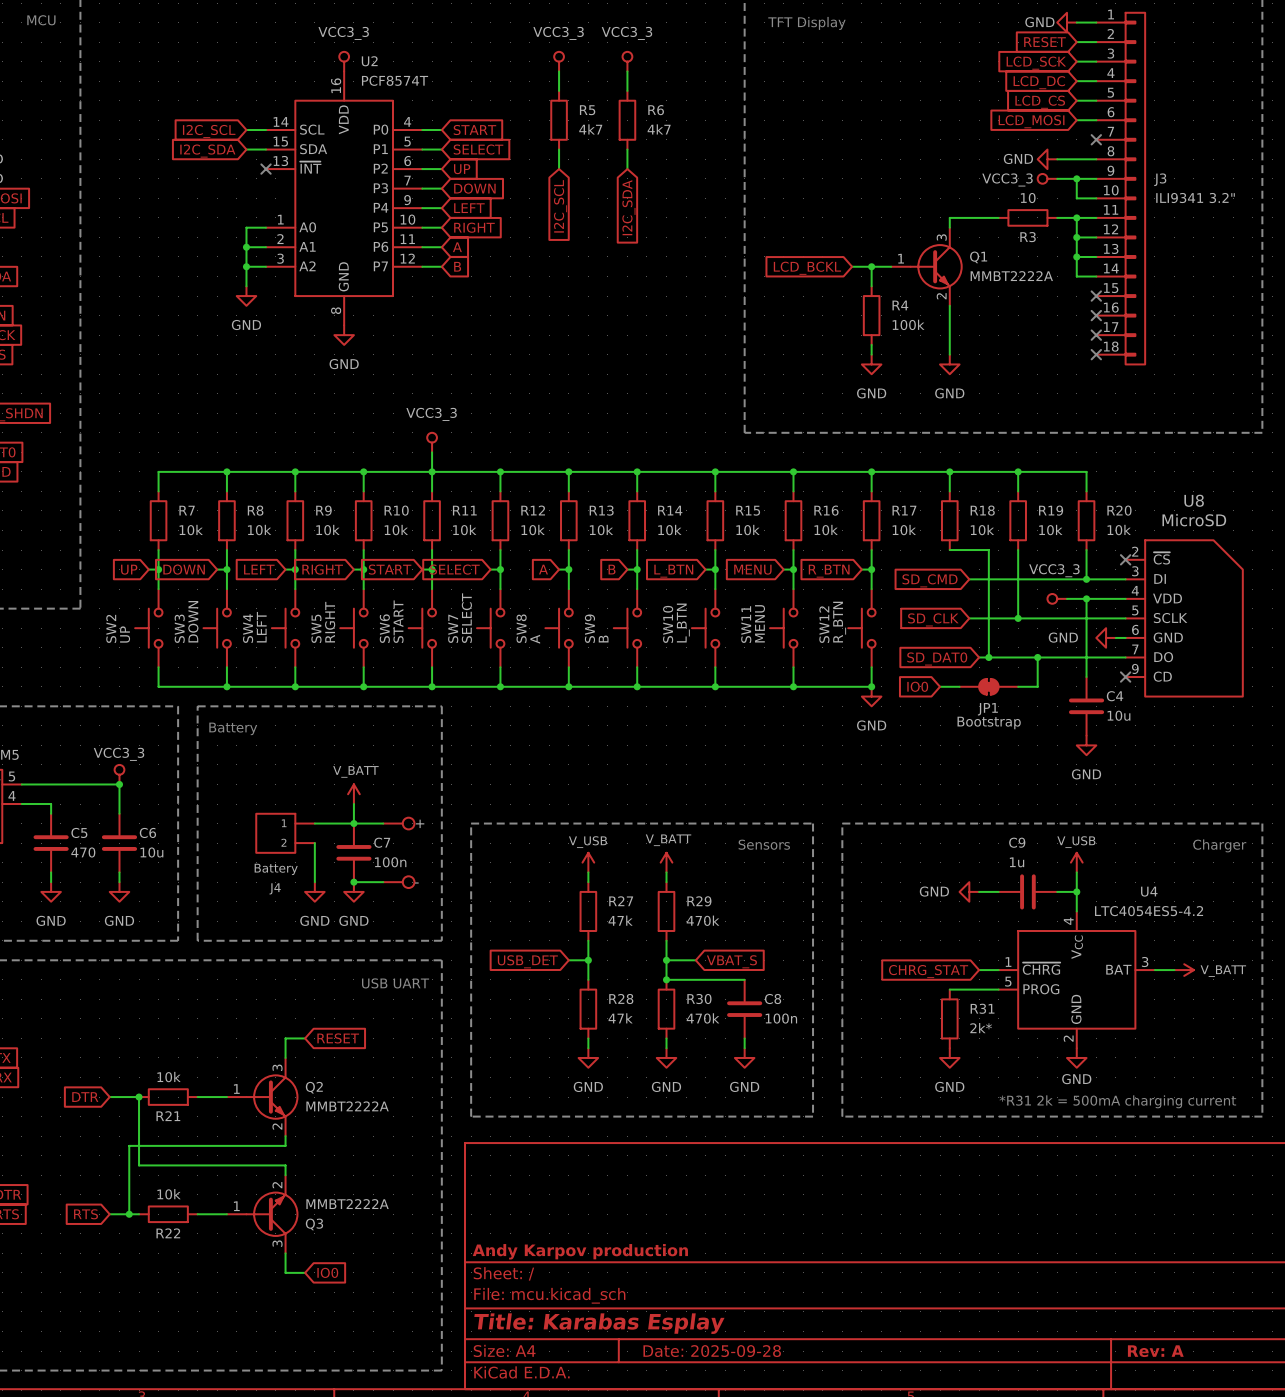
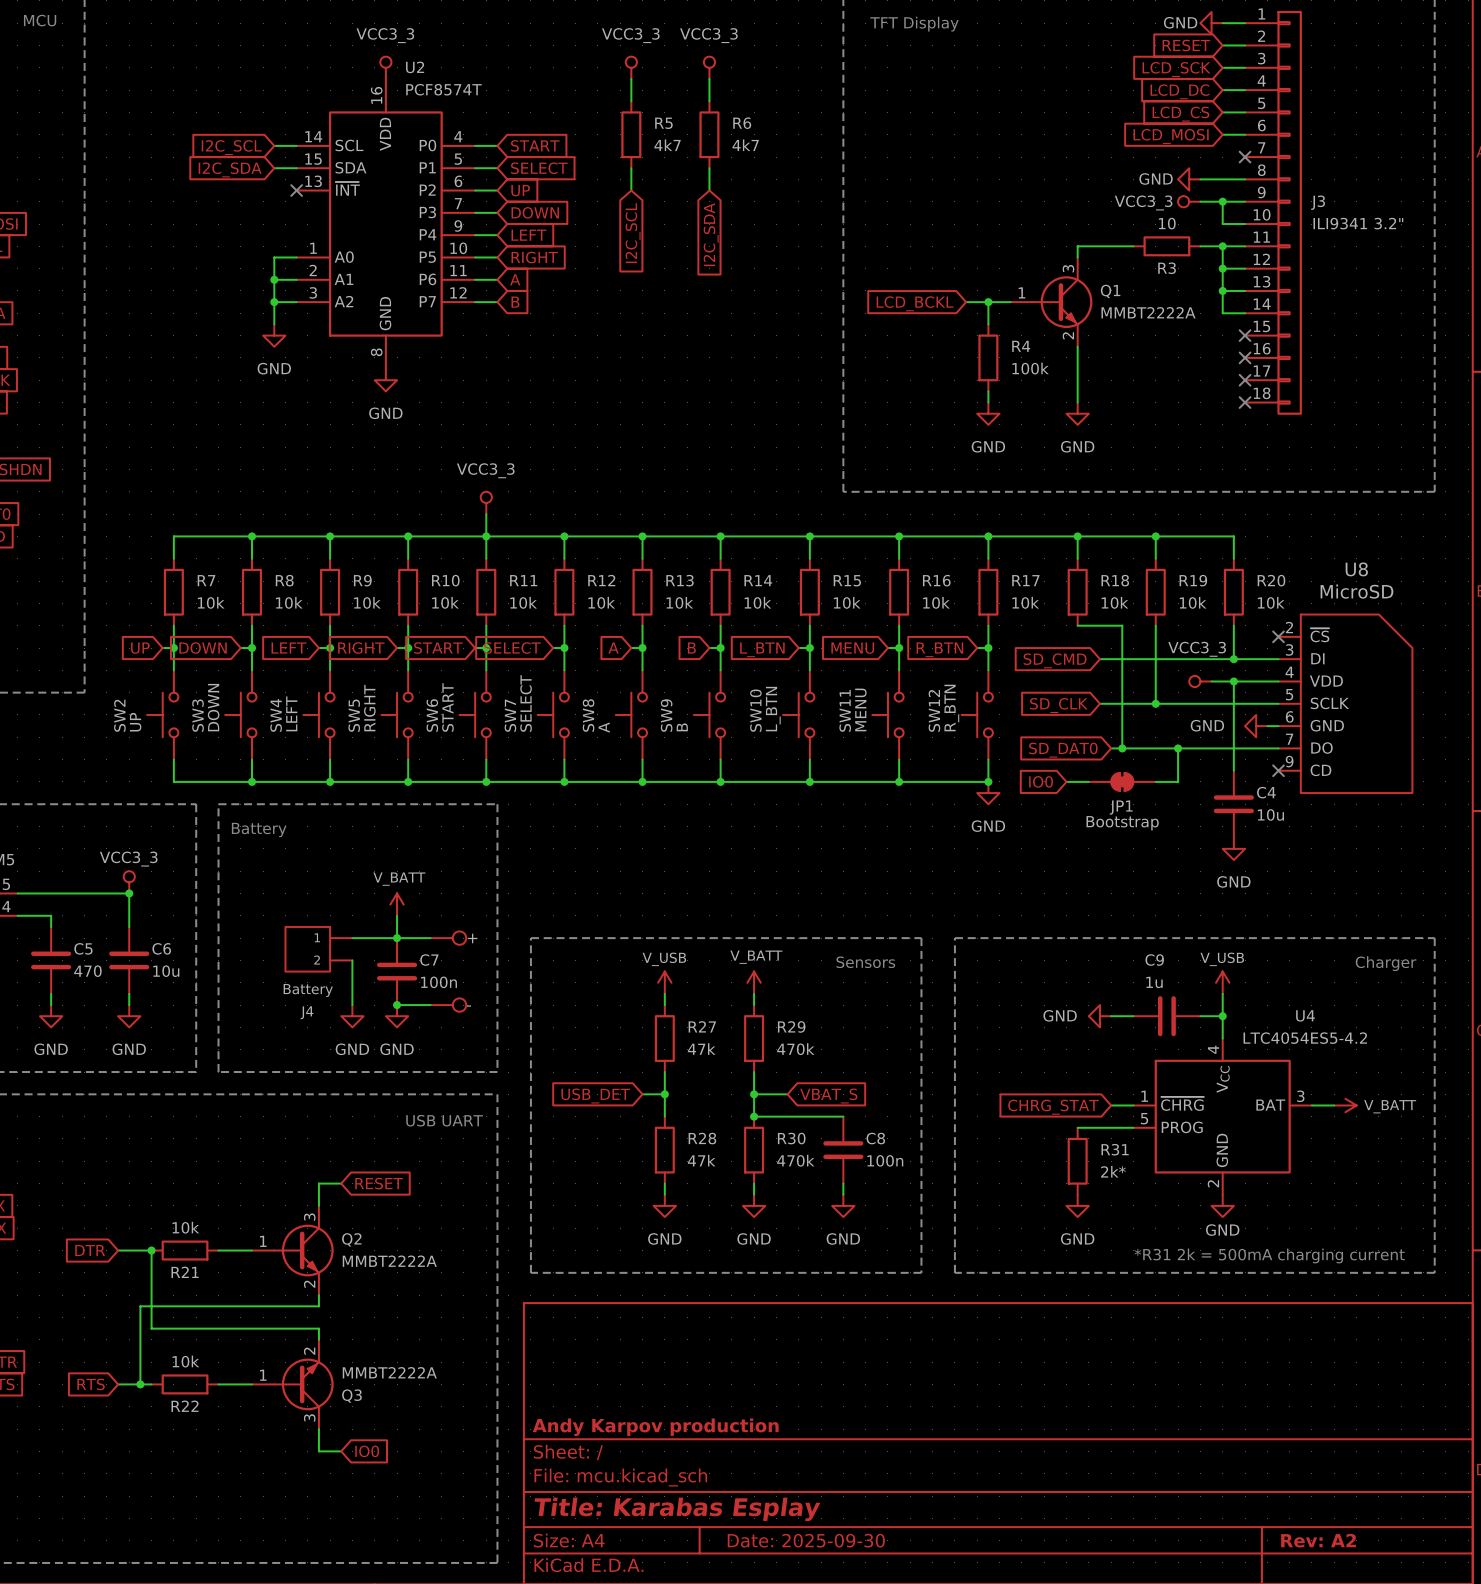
title block: Date: 2025-09-28 (712, 1351) -> Date: 2025-09-30 (806, 1540)
title block: Rev: A (1155, 1351) -> Rev: A2 (1318, 1540)

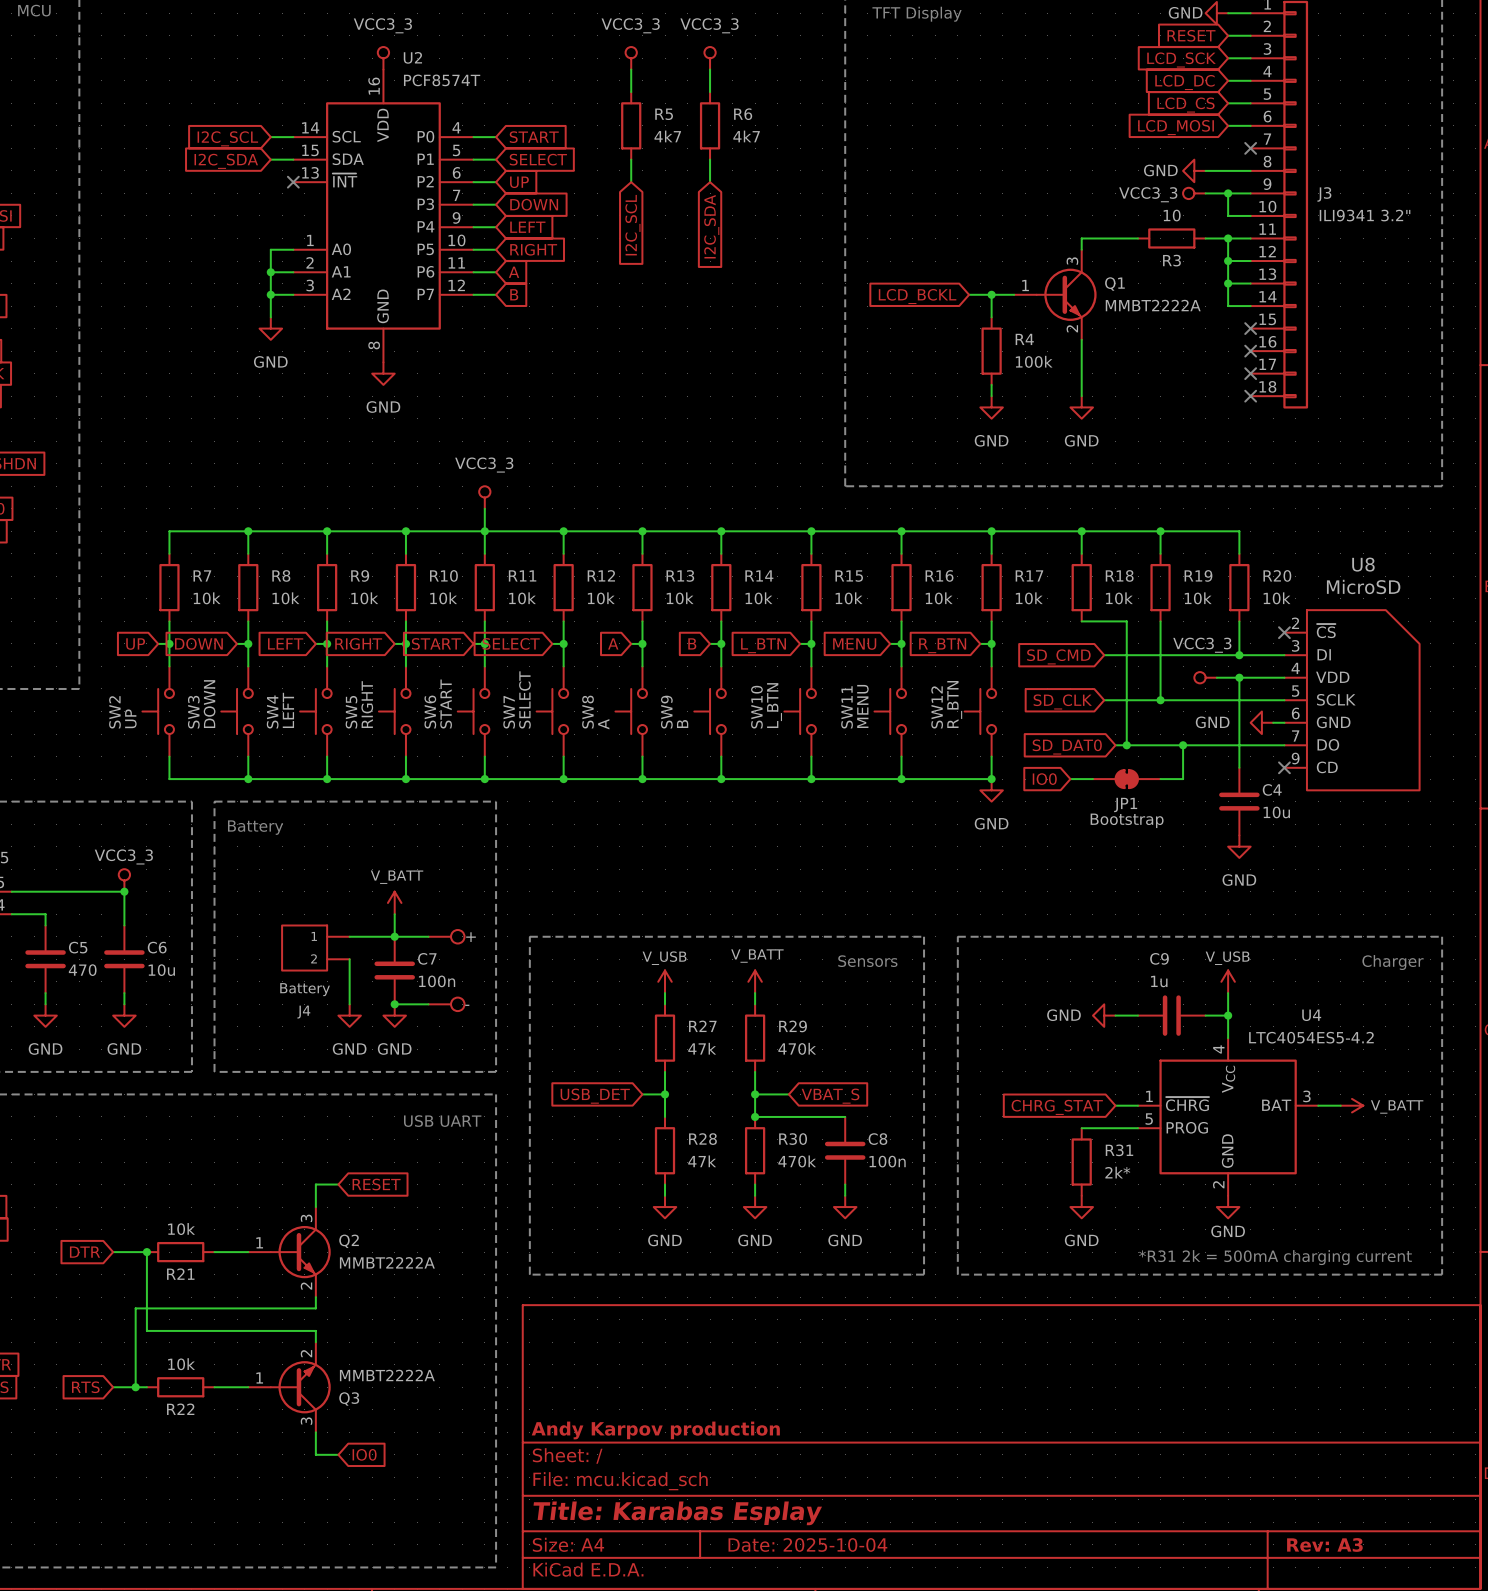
title block: Date: 2025-09-30 (806, 1540) -> Date: 2025-10-04 (807, 1544)
title block: Rev: A2 (1318, 1540) -> Rev: A3 (1324, 1544)

